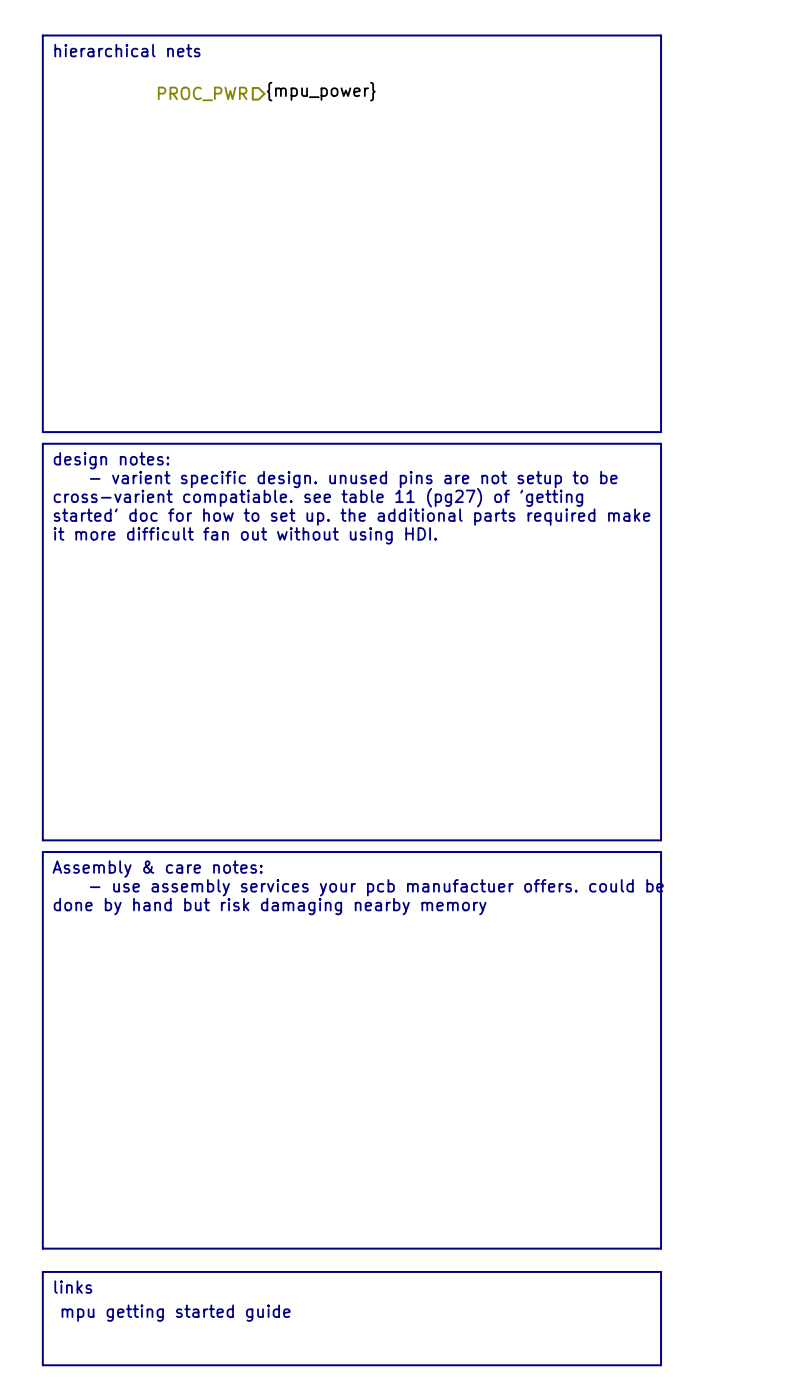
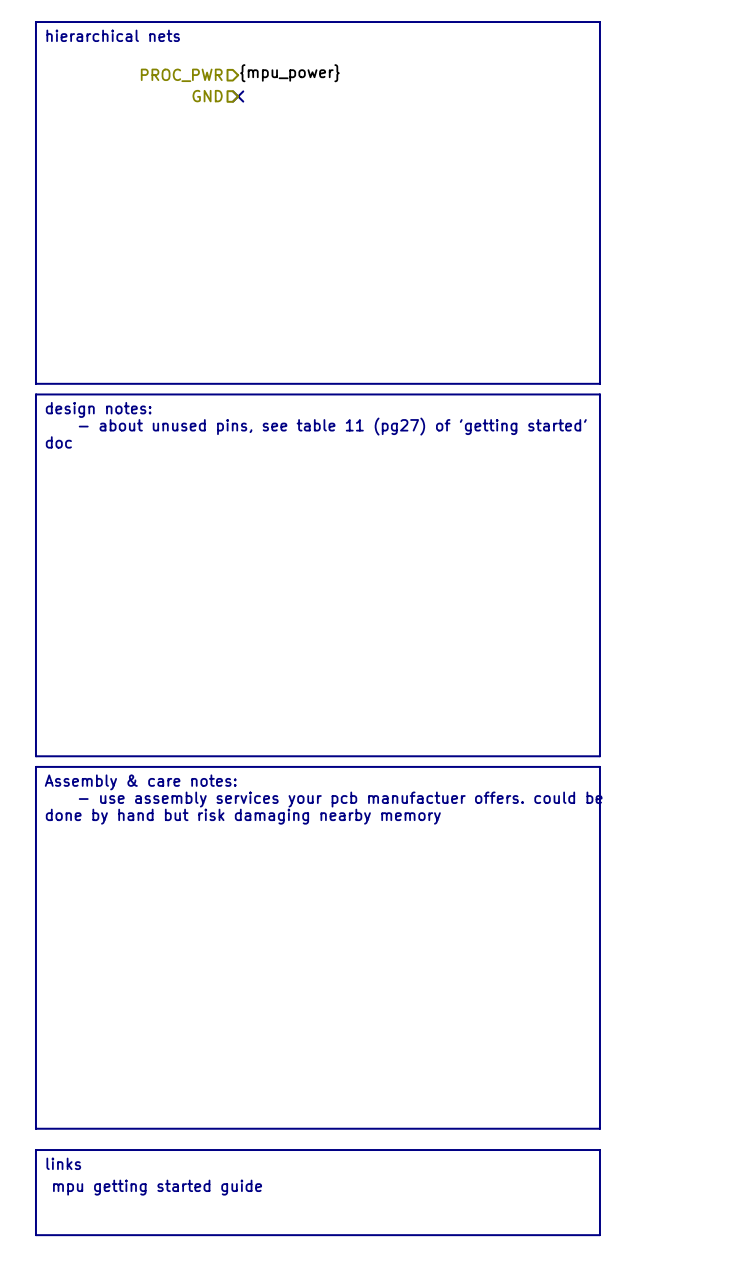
hierarchical label: none -> GND (207, 96)
no-connect mark: none -> (238, 96)
text: - varient specific design. unused pins are not setup to be (353, 479) -> - about unused pins, see table 11 (pg27) of 'getting started' (332, 426)
text: cross-varient compatiable. see table 11 (pg27) of 'getting (318, 497) -> doc (58, 442)
text: started' doc for how to set up. the additional parts required make (352, 517) -> none
text: it more difficult fan out without using HDI. (245, 535) -> none

